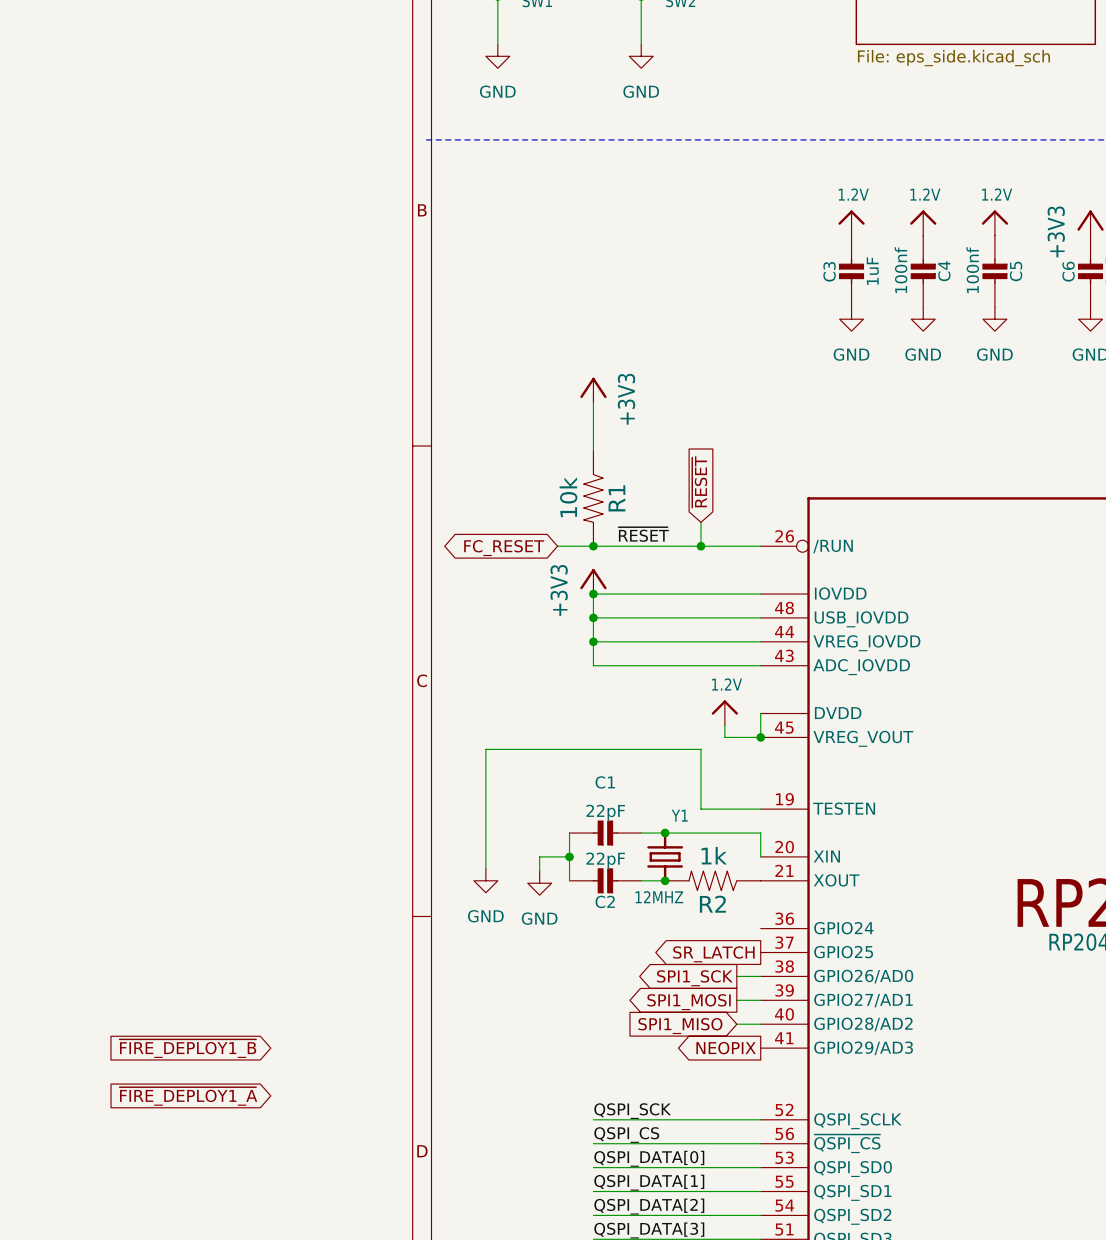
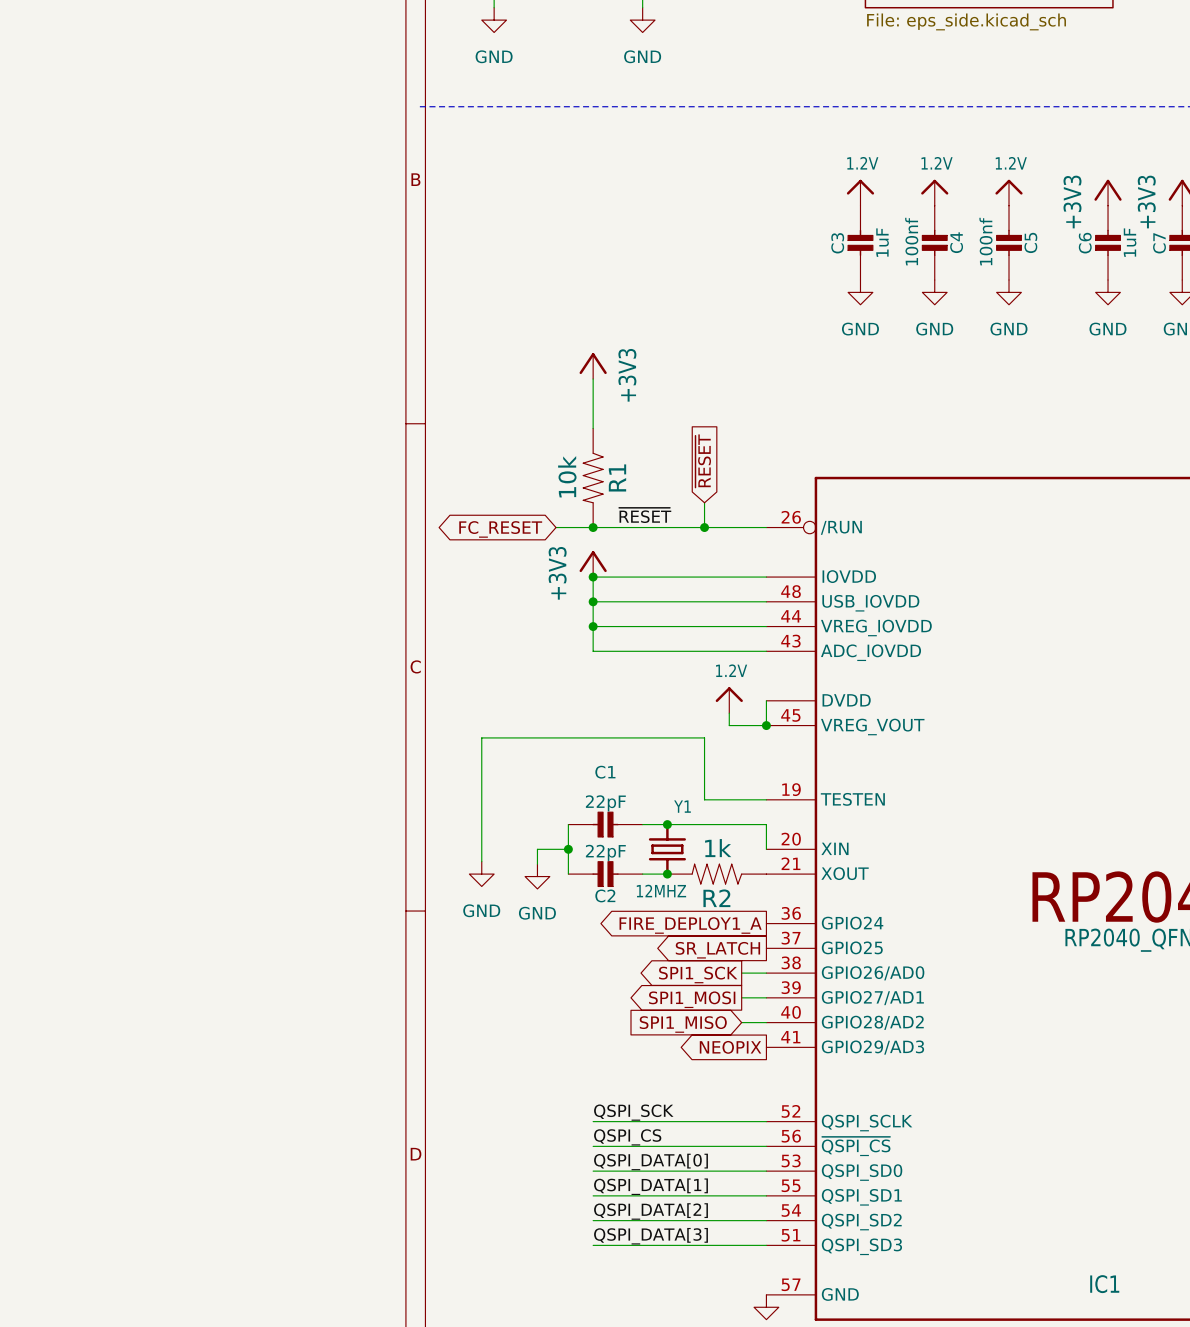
global label: none -> FIRE_DEPLOY1_A (690, 925)
global label: ~{FIRE_DEPLOY1_B} (187, 1048) -> none
global label: ~{FIRE_DEPLOY1_A} (188, 1096) -> none

